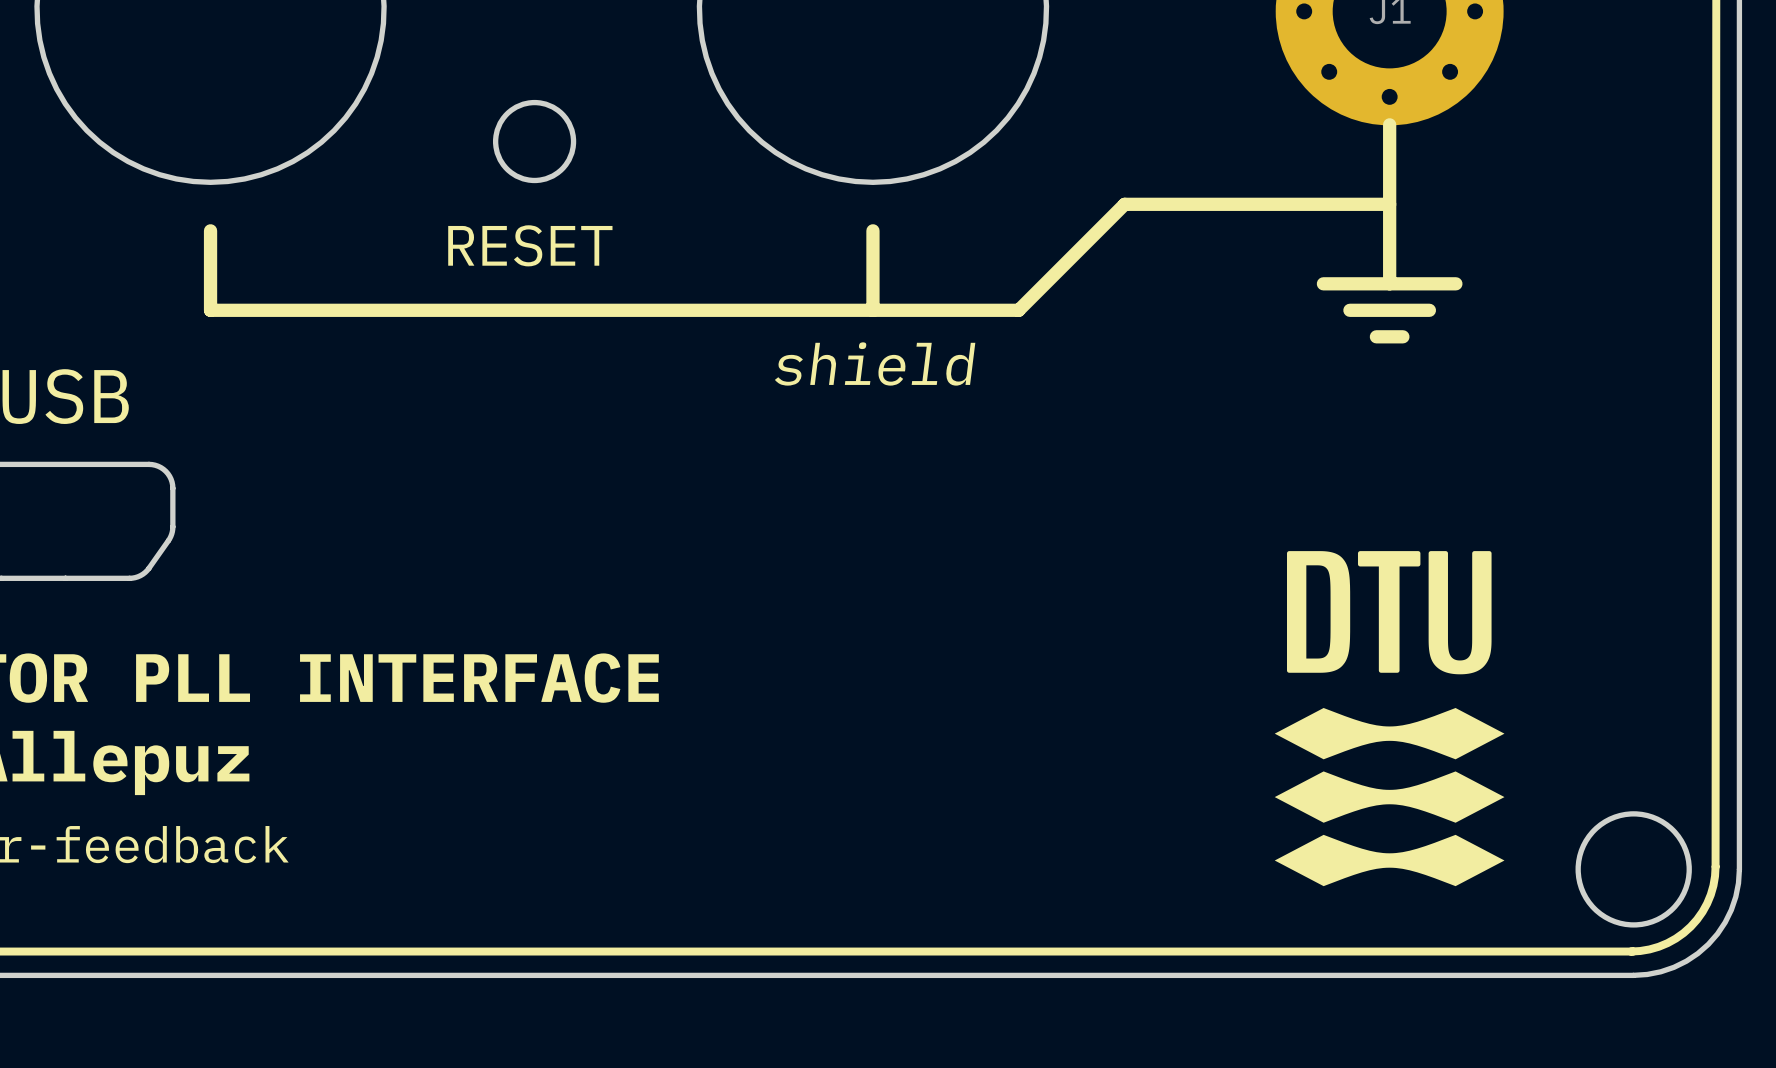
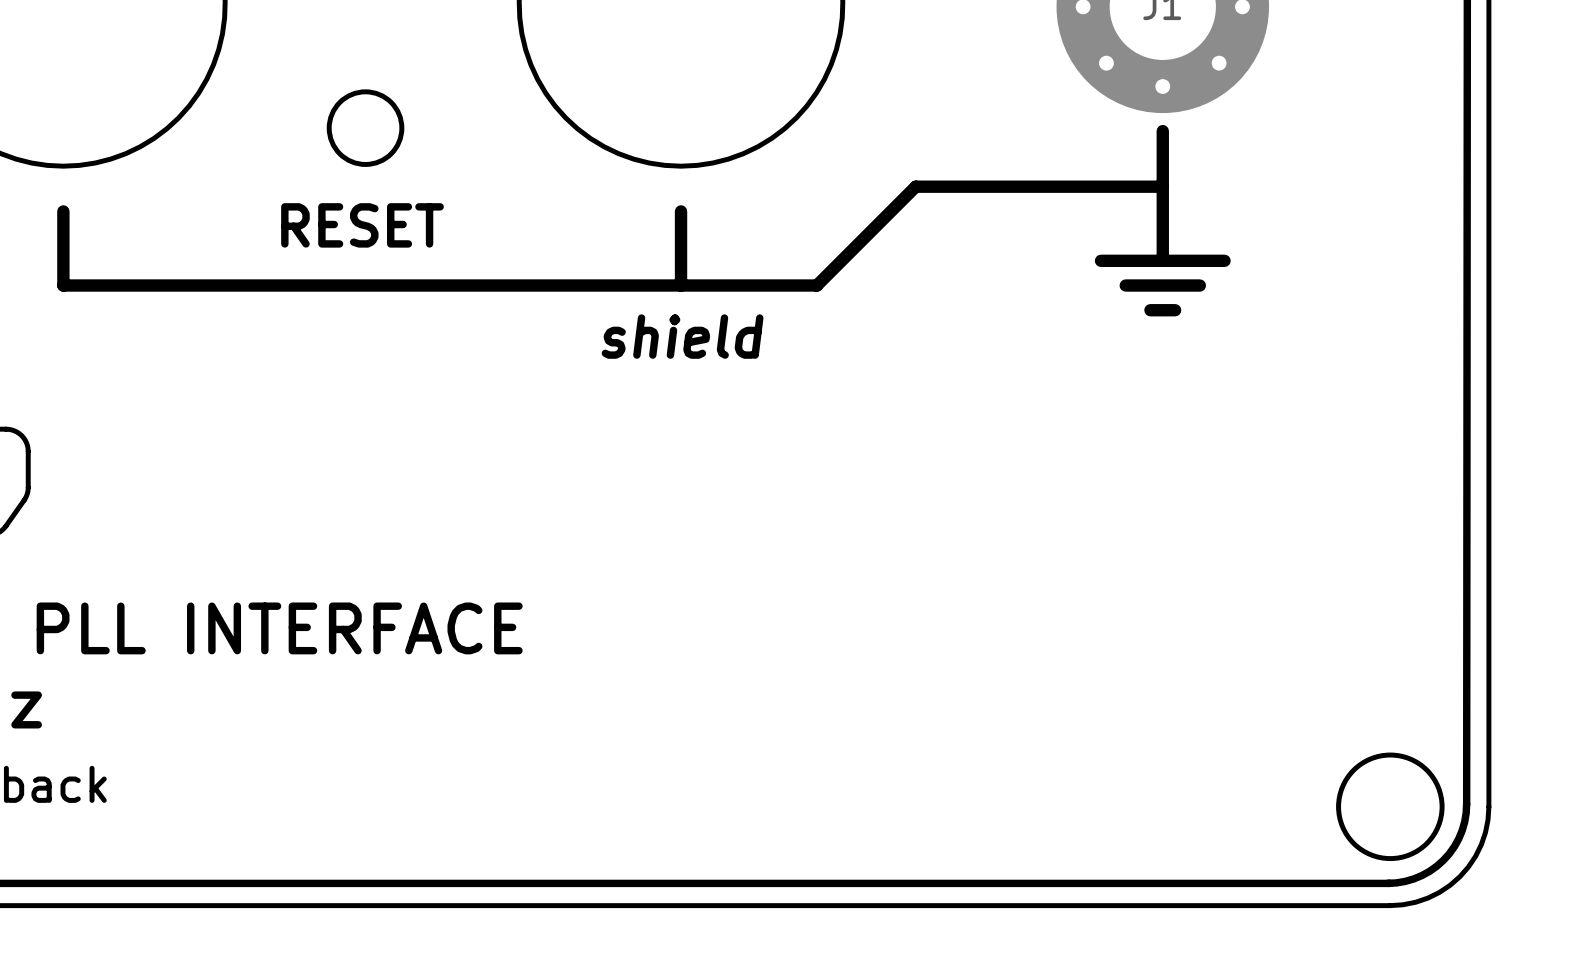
line: (1389, 124) (1389, 144) -> none
drawing: [1287, 551, 1492, 675] -> none
drawing: [1274, 707, 1505, 887] -> none

